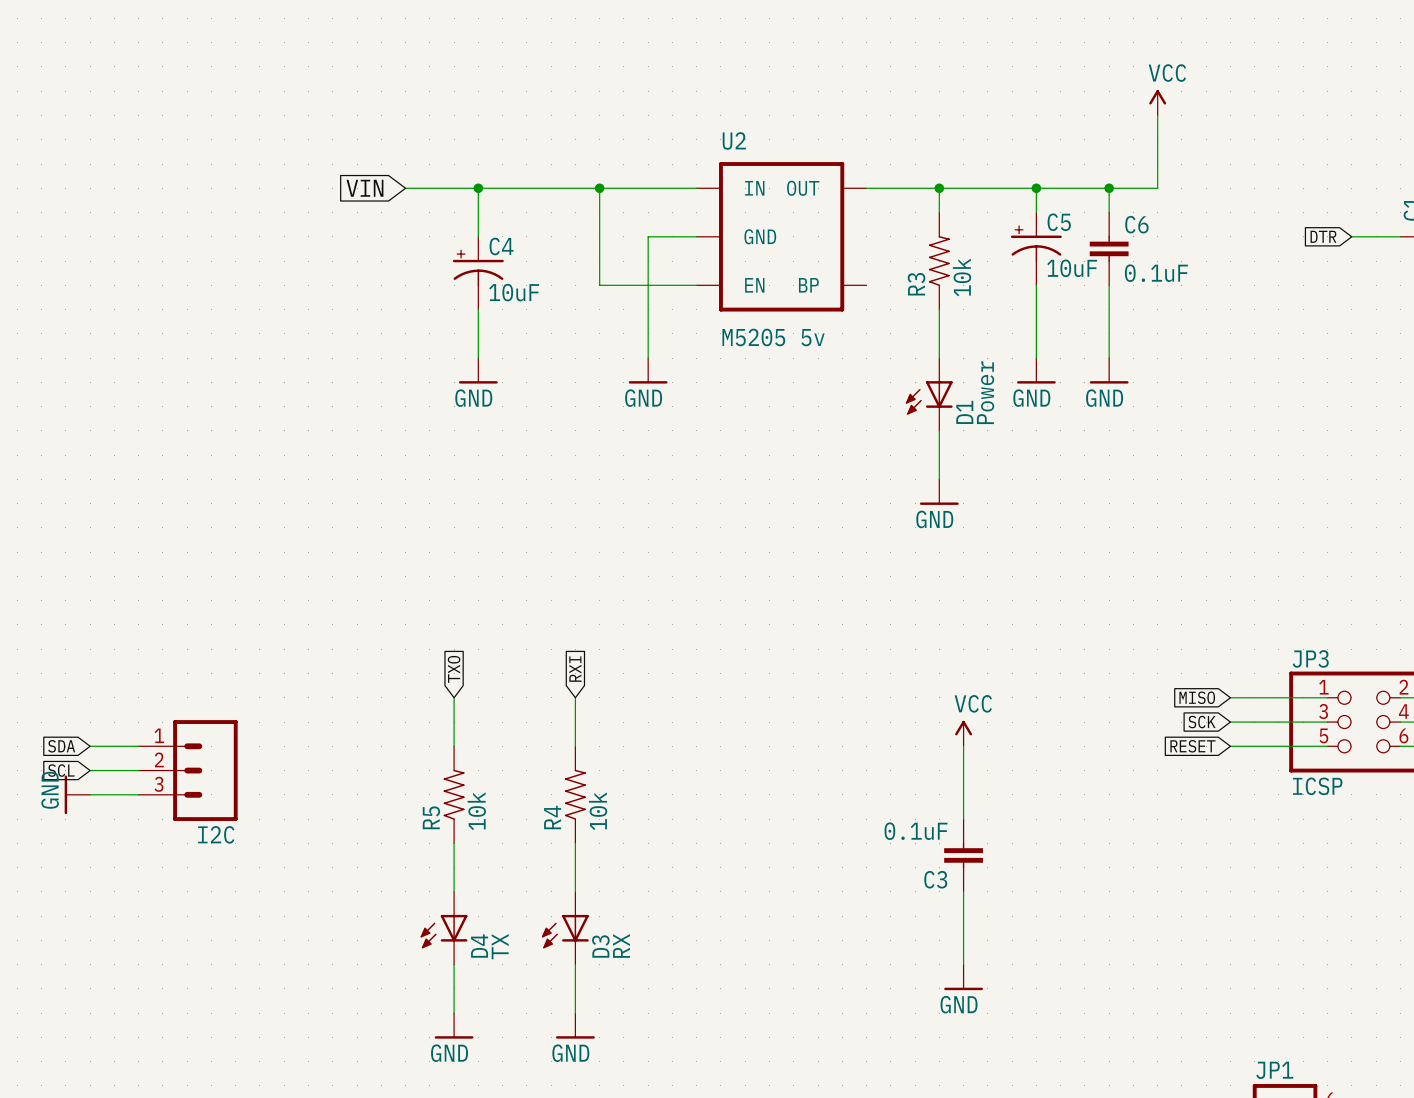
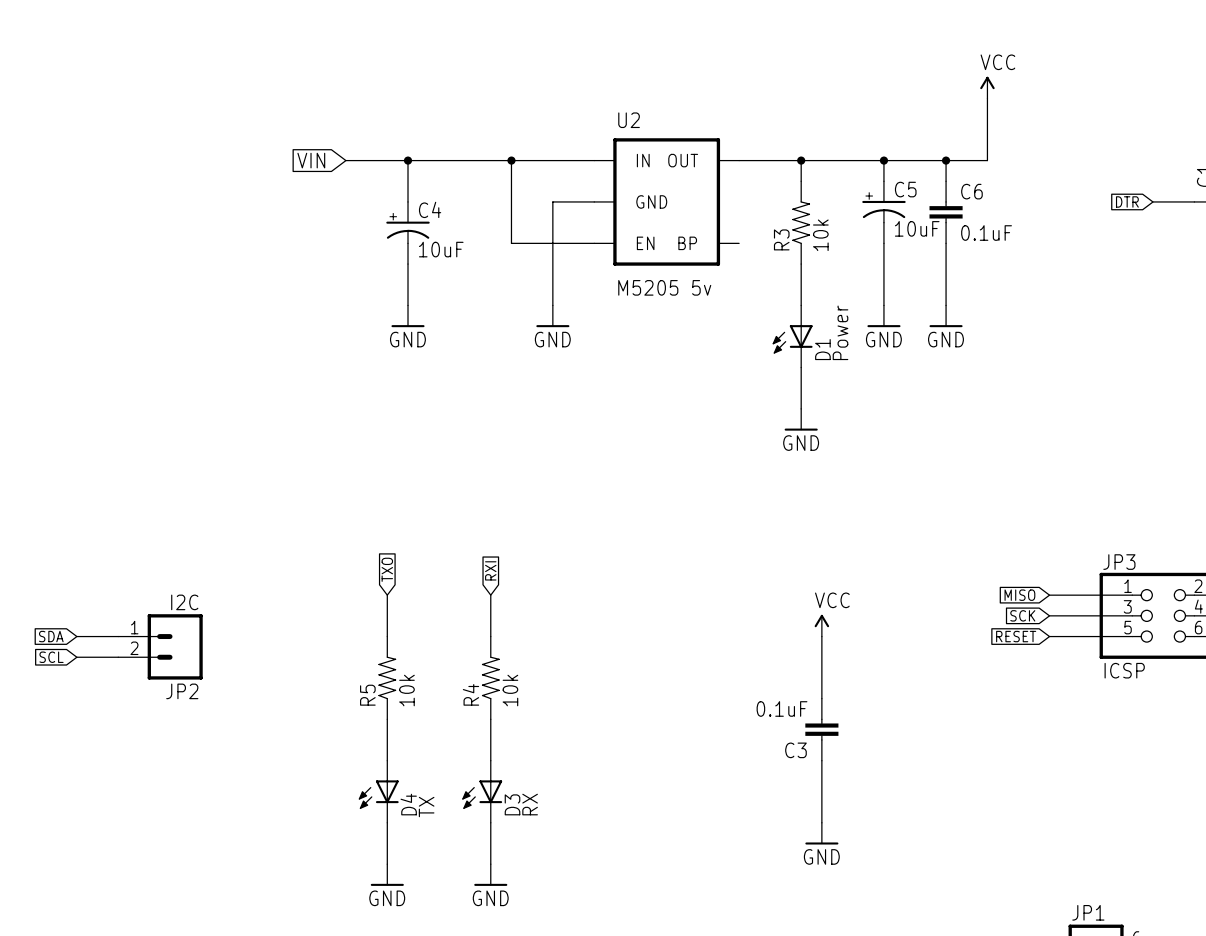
JP2: none -> I2C (160, 646)
I2C: (188, 770) -> none
power symbol: GND (77, 794) -> none
wire: (90, 794) (138, 794) -> none

